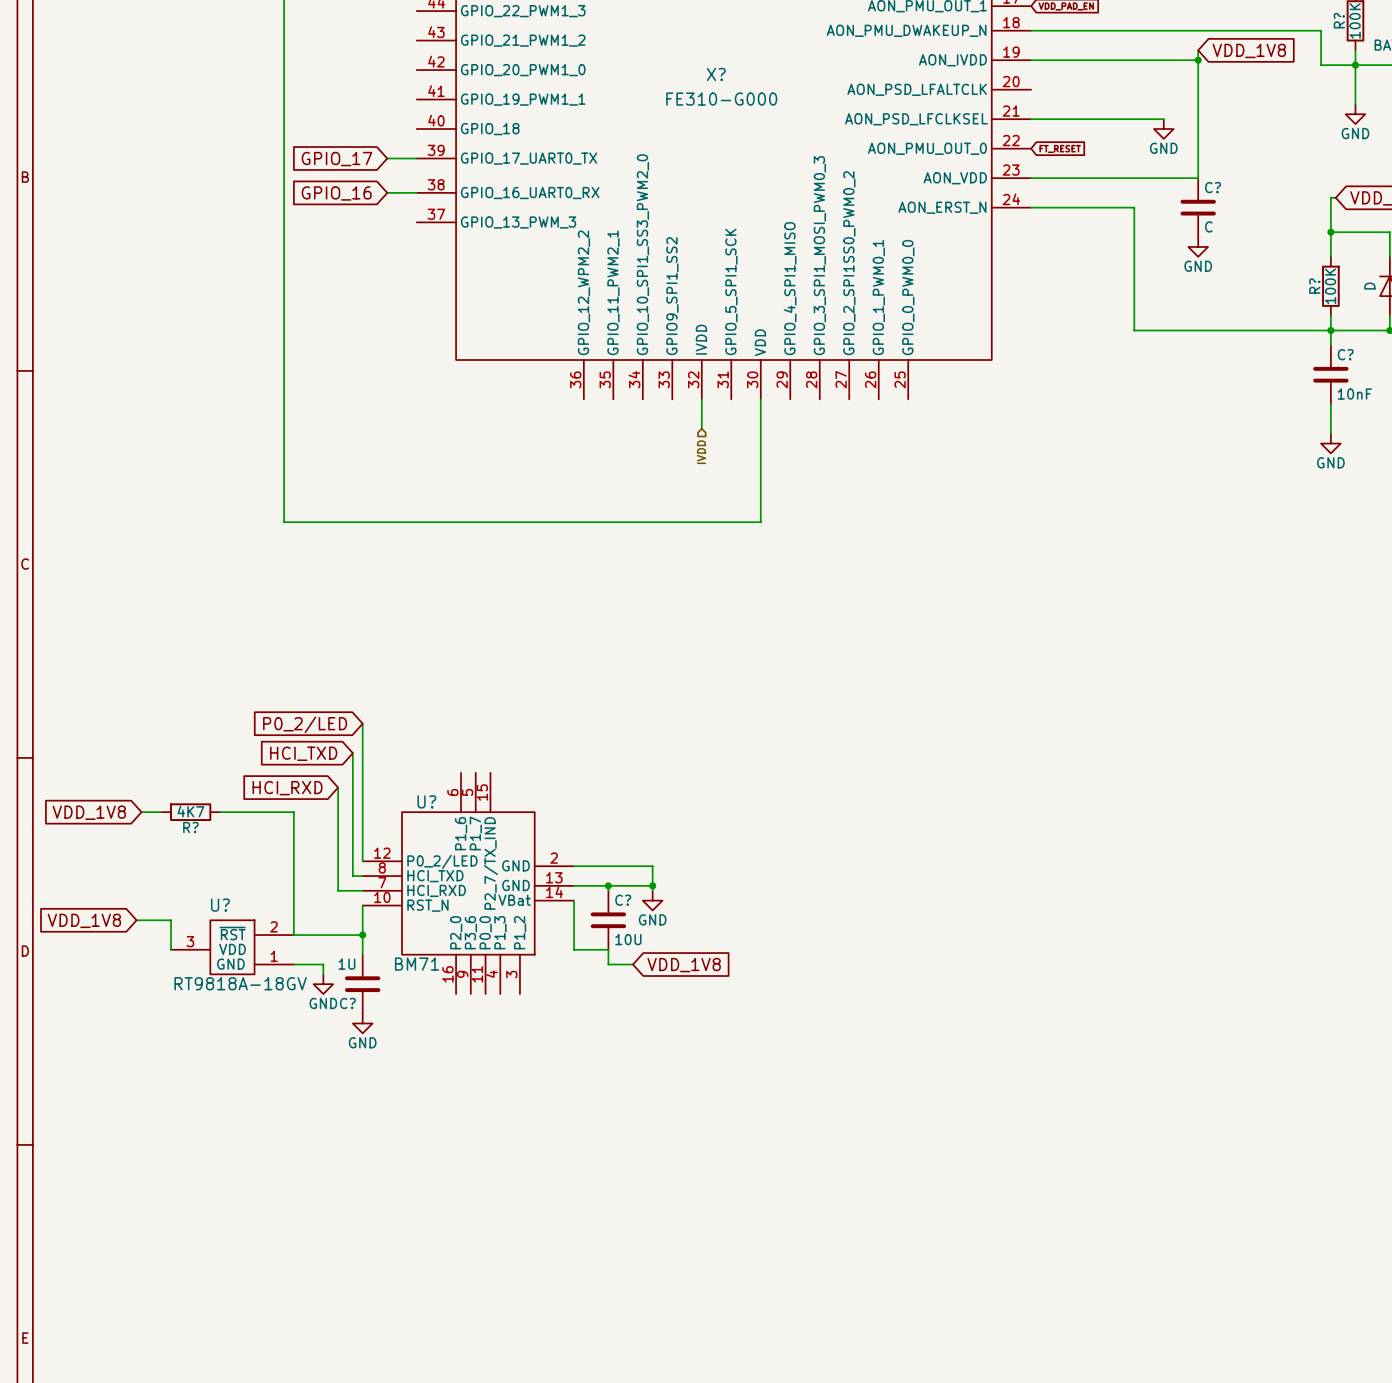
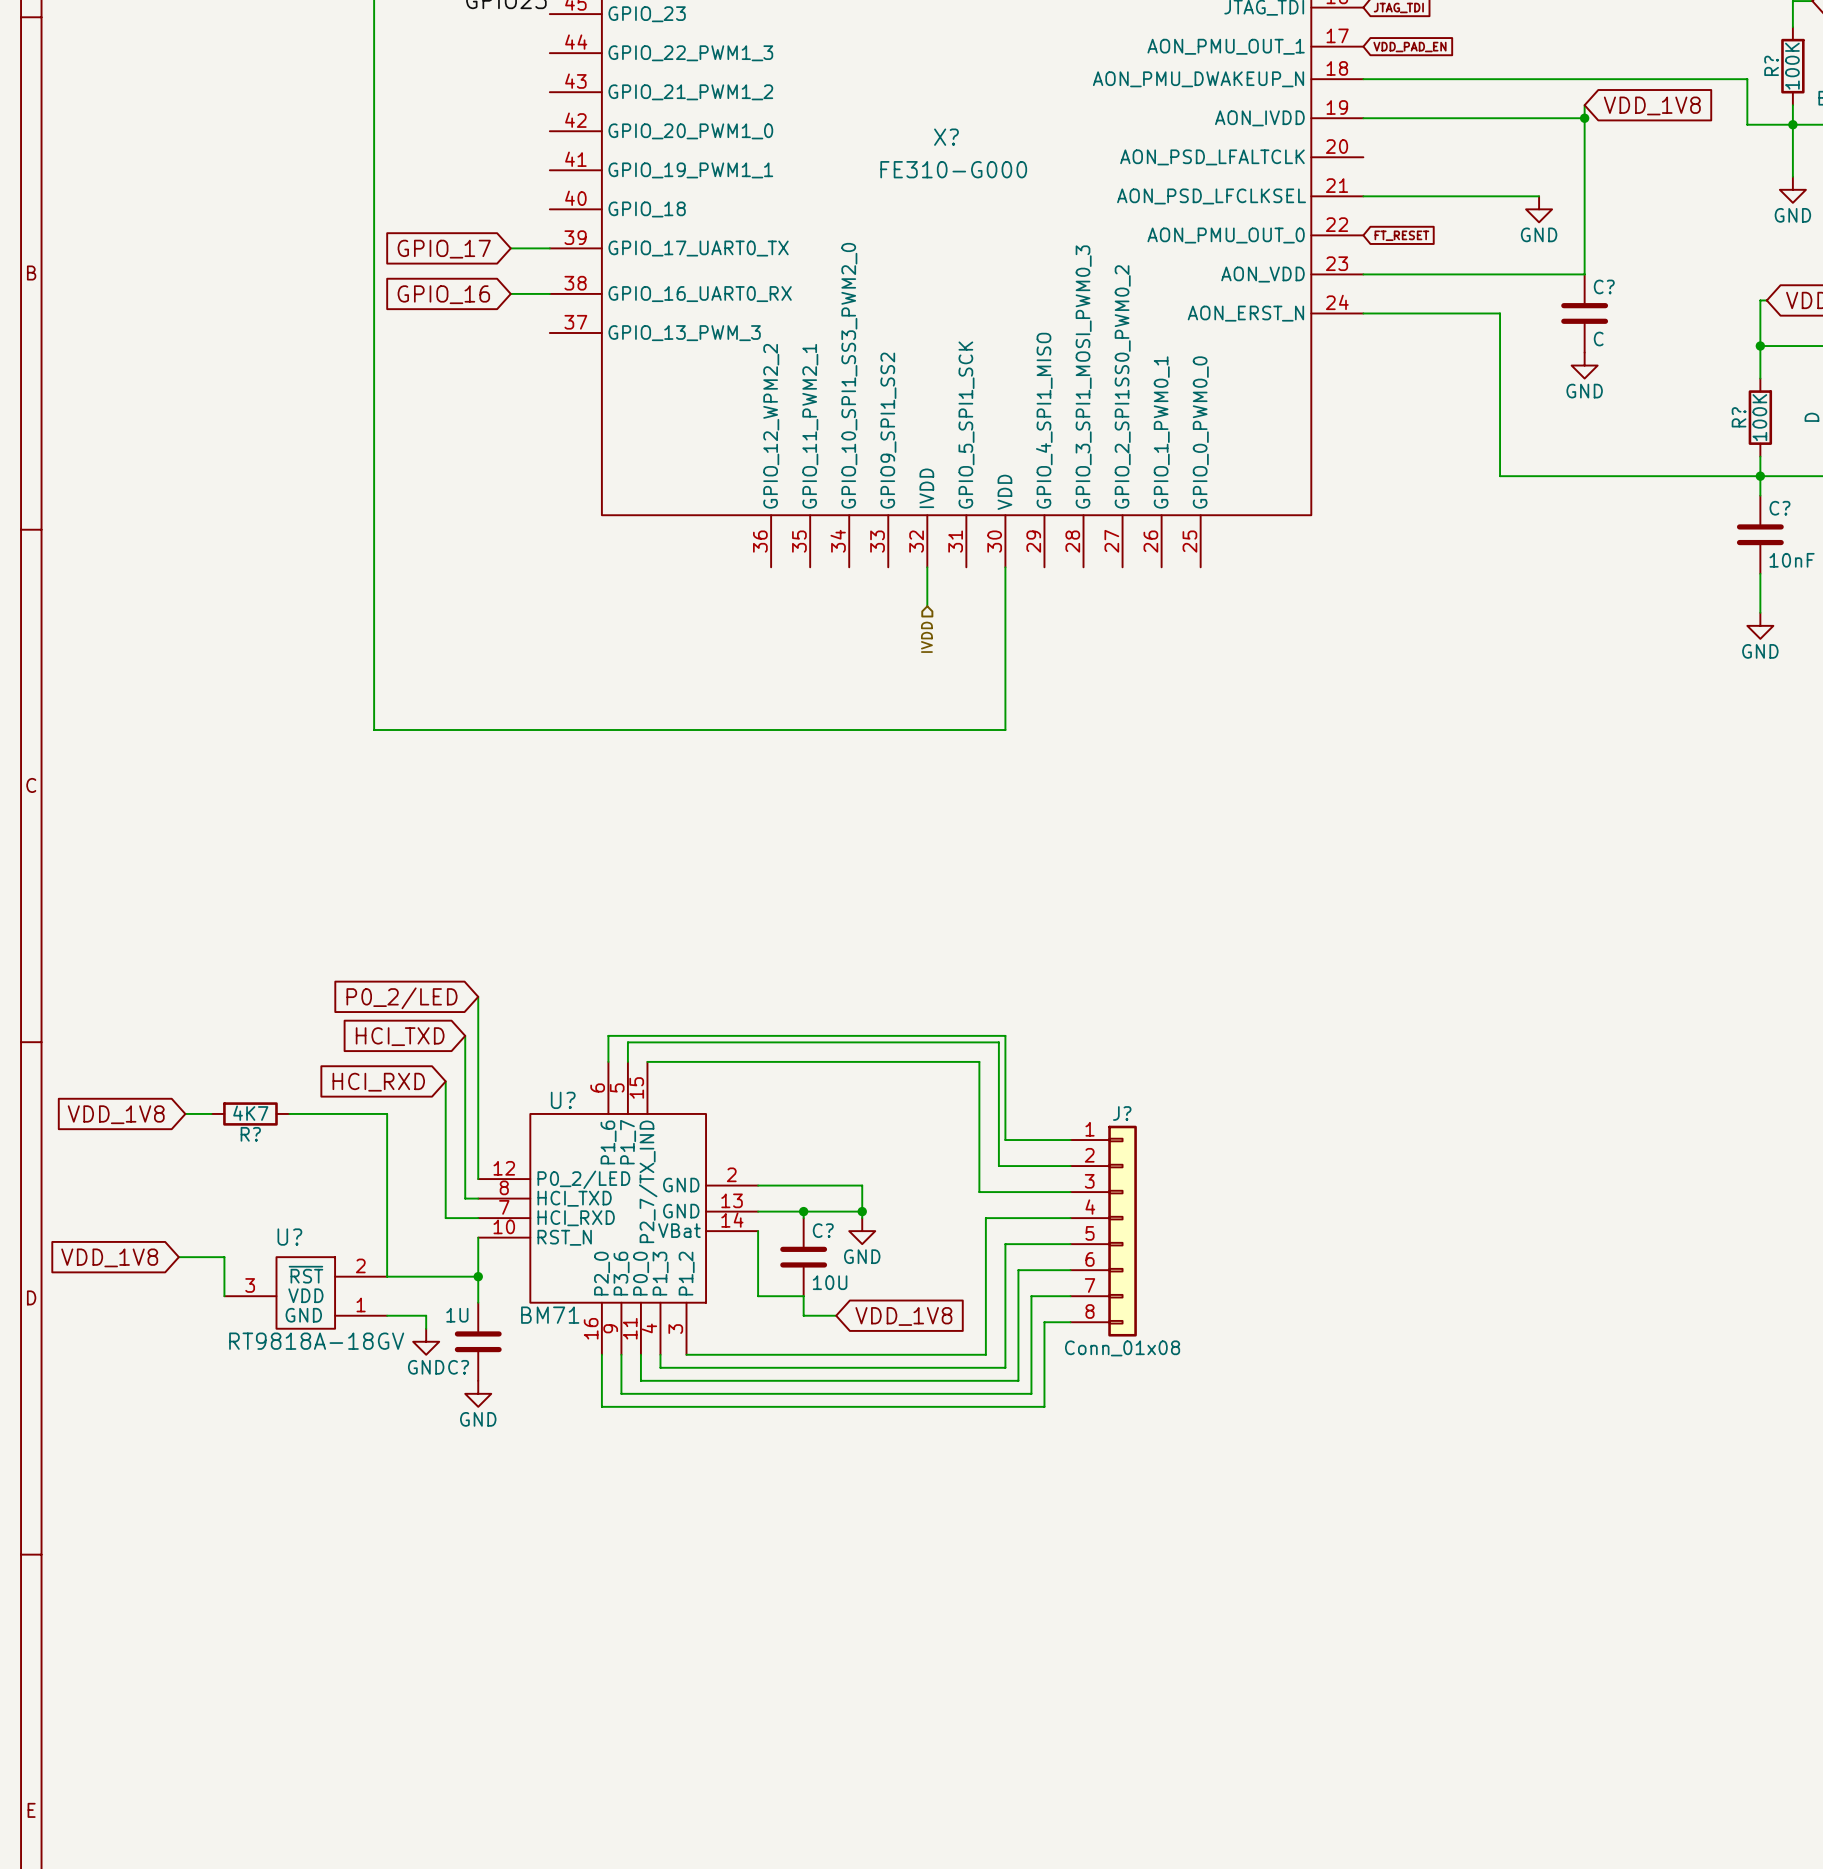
wire: none -> (608, 1061) (608, 1035) (1005, 1035) (1005, 1140) (1070, 1140)
wire: none -> (627, 1061) (627, 1042) (998, 1042) (998, 1166) (1070, 1166)
wire: none -> (647, 1061) (979, 1061) (979, 1192) (1070, 1192)
wire: none -> (1070, 1218) (985, 1218) (985, 1354) (686, 1354)
J?: none -> Conn_01x08 (1103, 1231)
wire: none -> (1070, 1244) (1005, 1244) (1005, 1367) (660, 1367) (660, 1354)
wire: none -> (1070, 1270) (1018, 1270) (1018, 1380) (640, 1380) (640, 1354)
wire: none -> (1070, 1296) (1031, 1296) (1031, 1393) (621, 1393) (621, 1354)
wire: none -> (1070, 1322) (1044, 1322) (1044, 1406) (601, 1406) (601, 1354)

